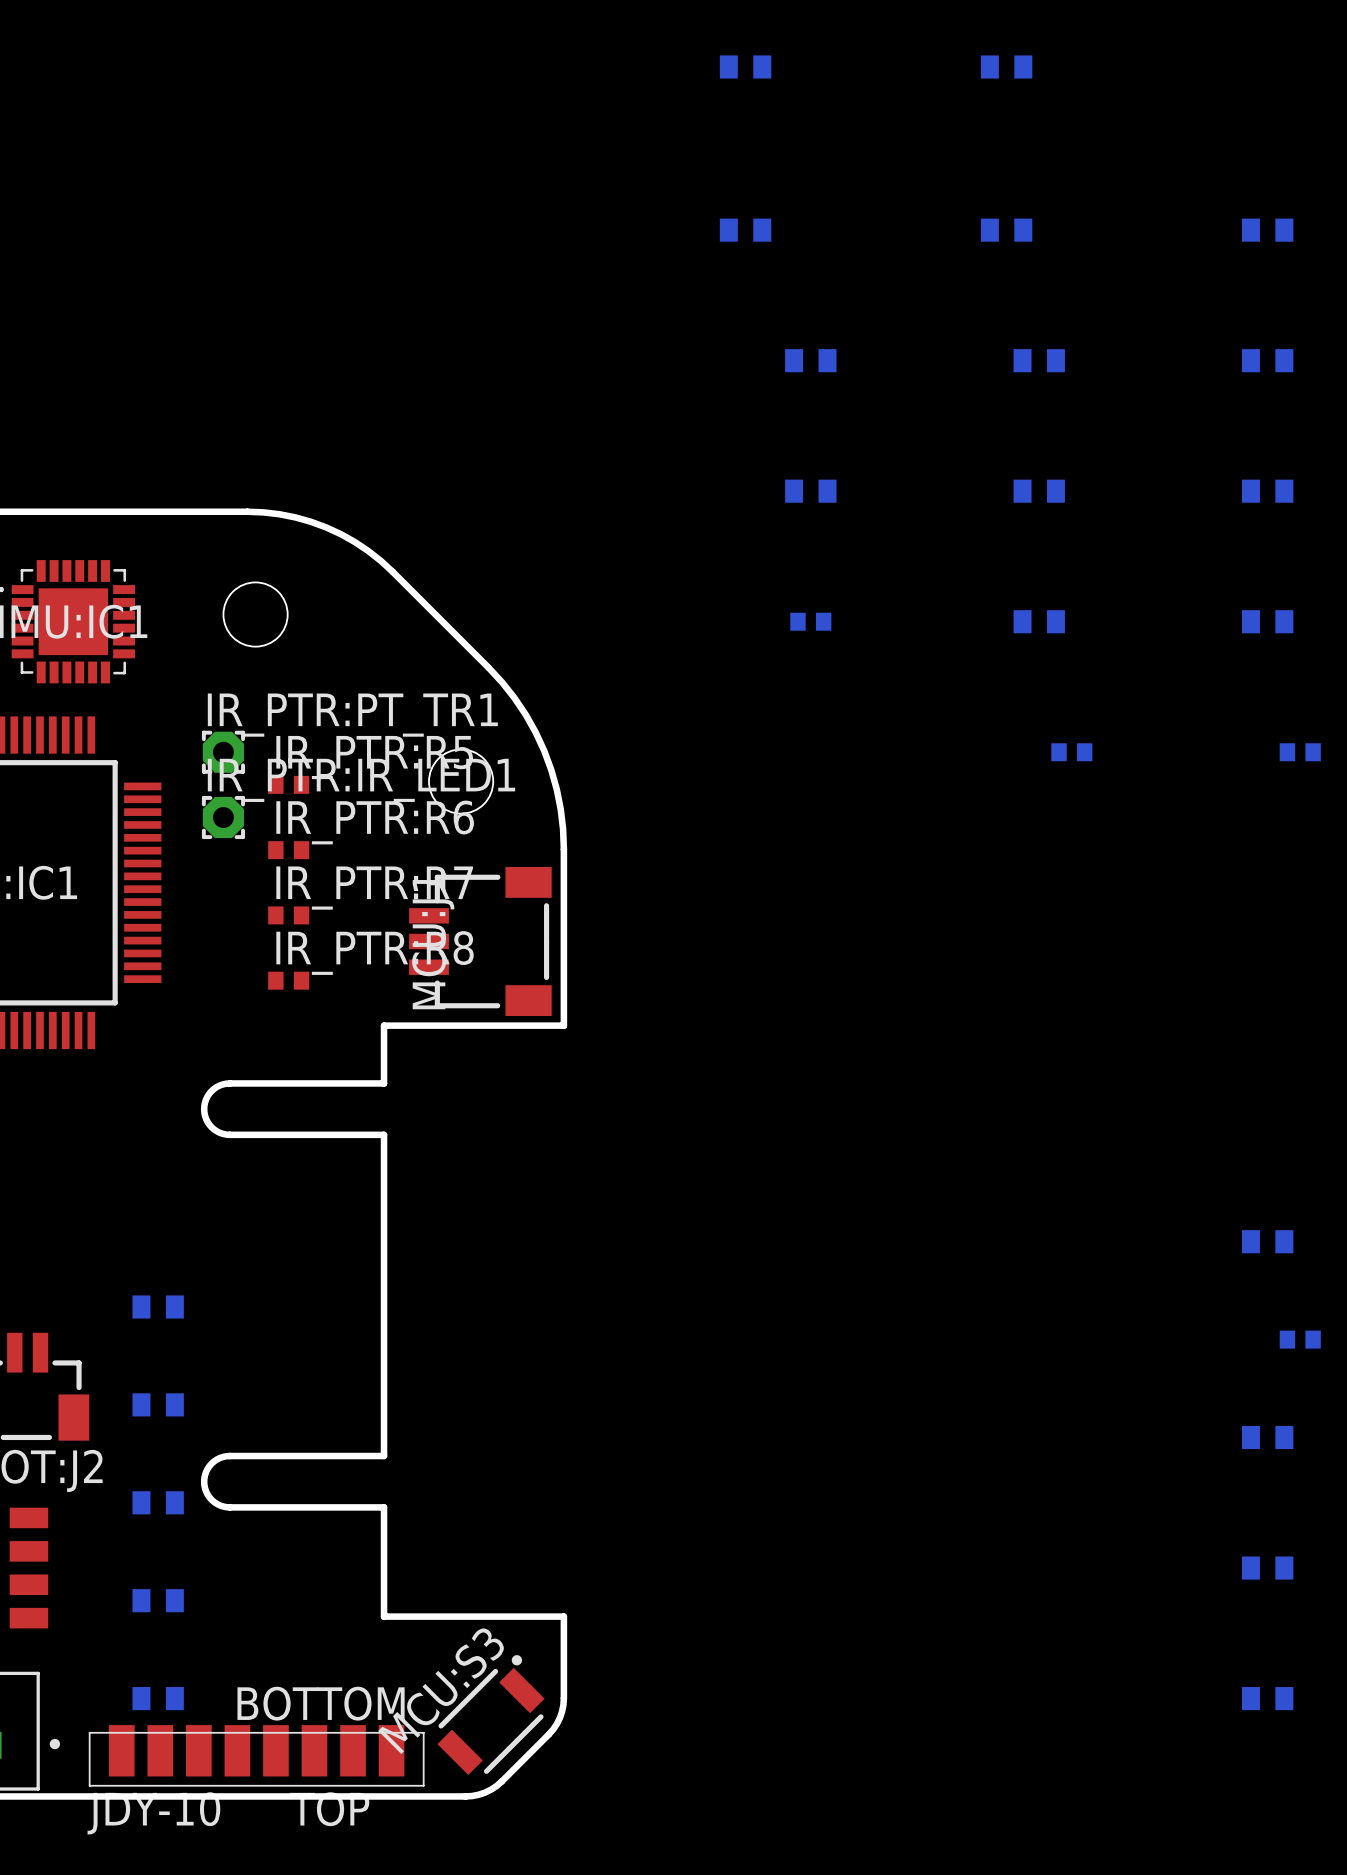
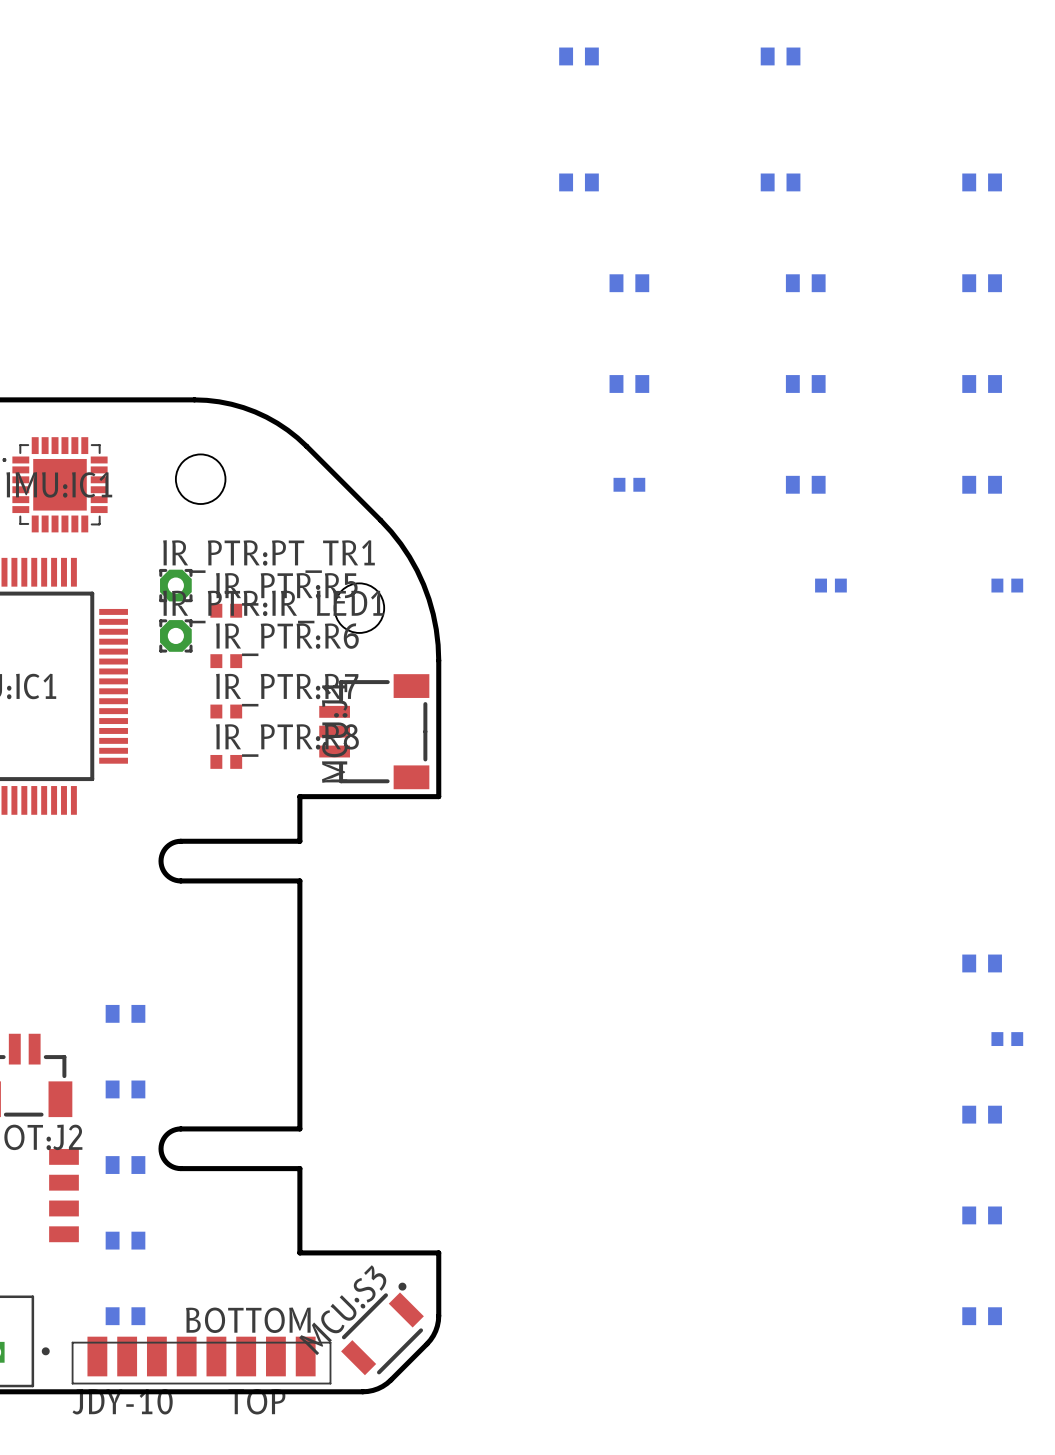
part position: (28, 1568) -> (64, 1195)

